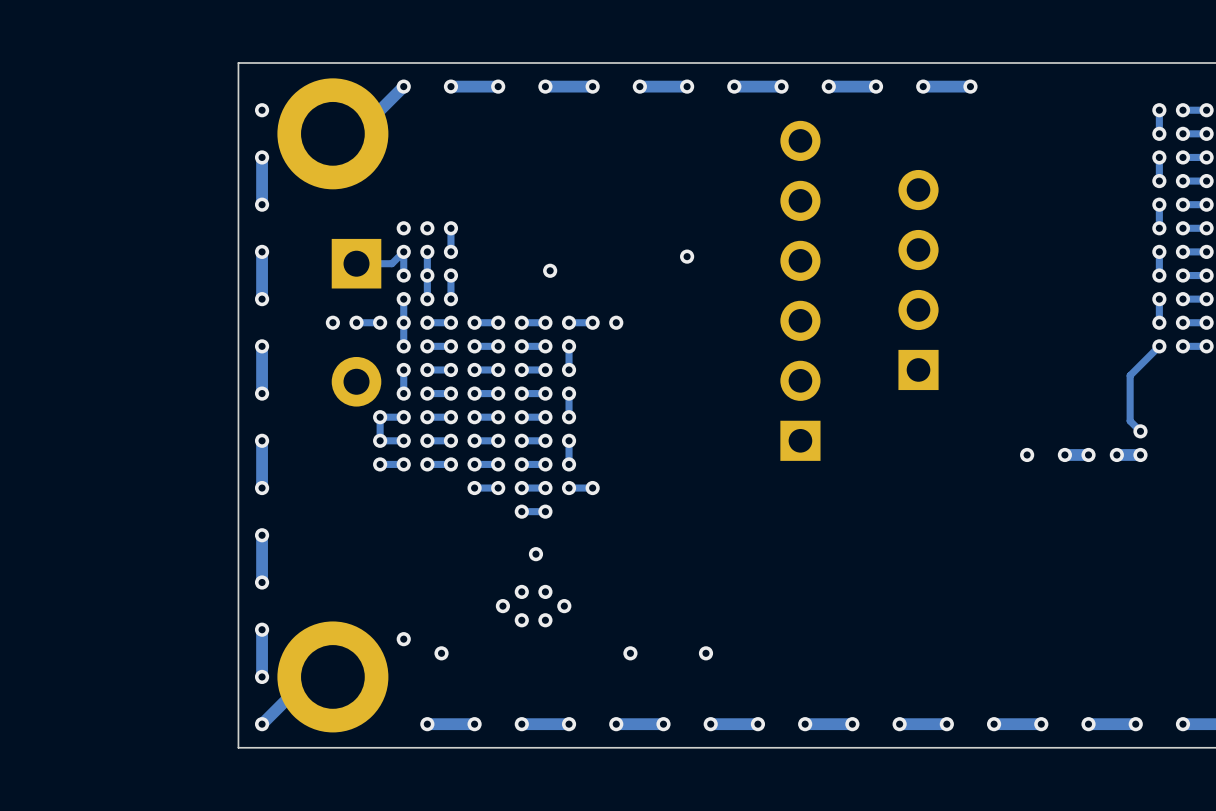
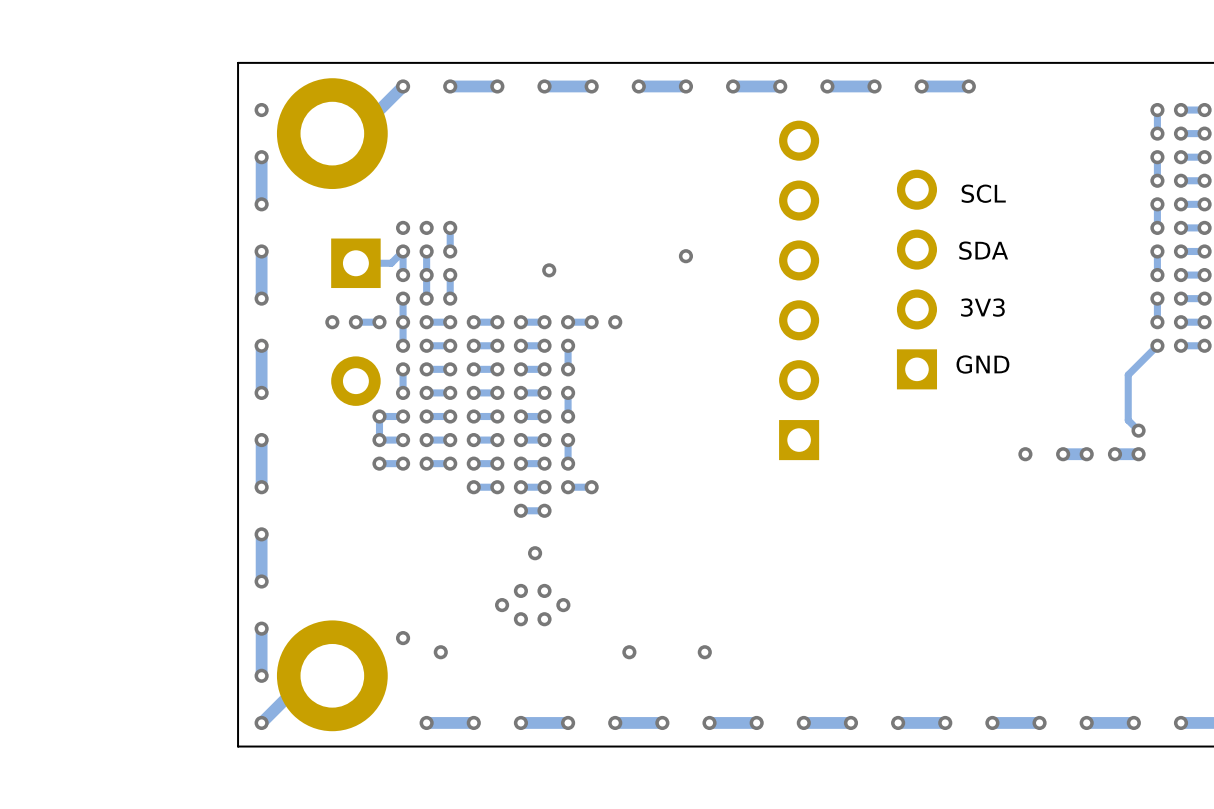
text: none -> SCL (983, 193)
text: none -> SDA (983, 250)
text: none -> 3V3 (982, 307)
text: none -> GND (982, 364)

